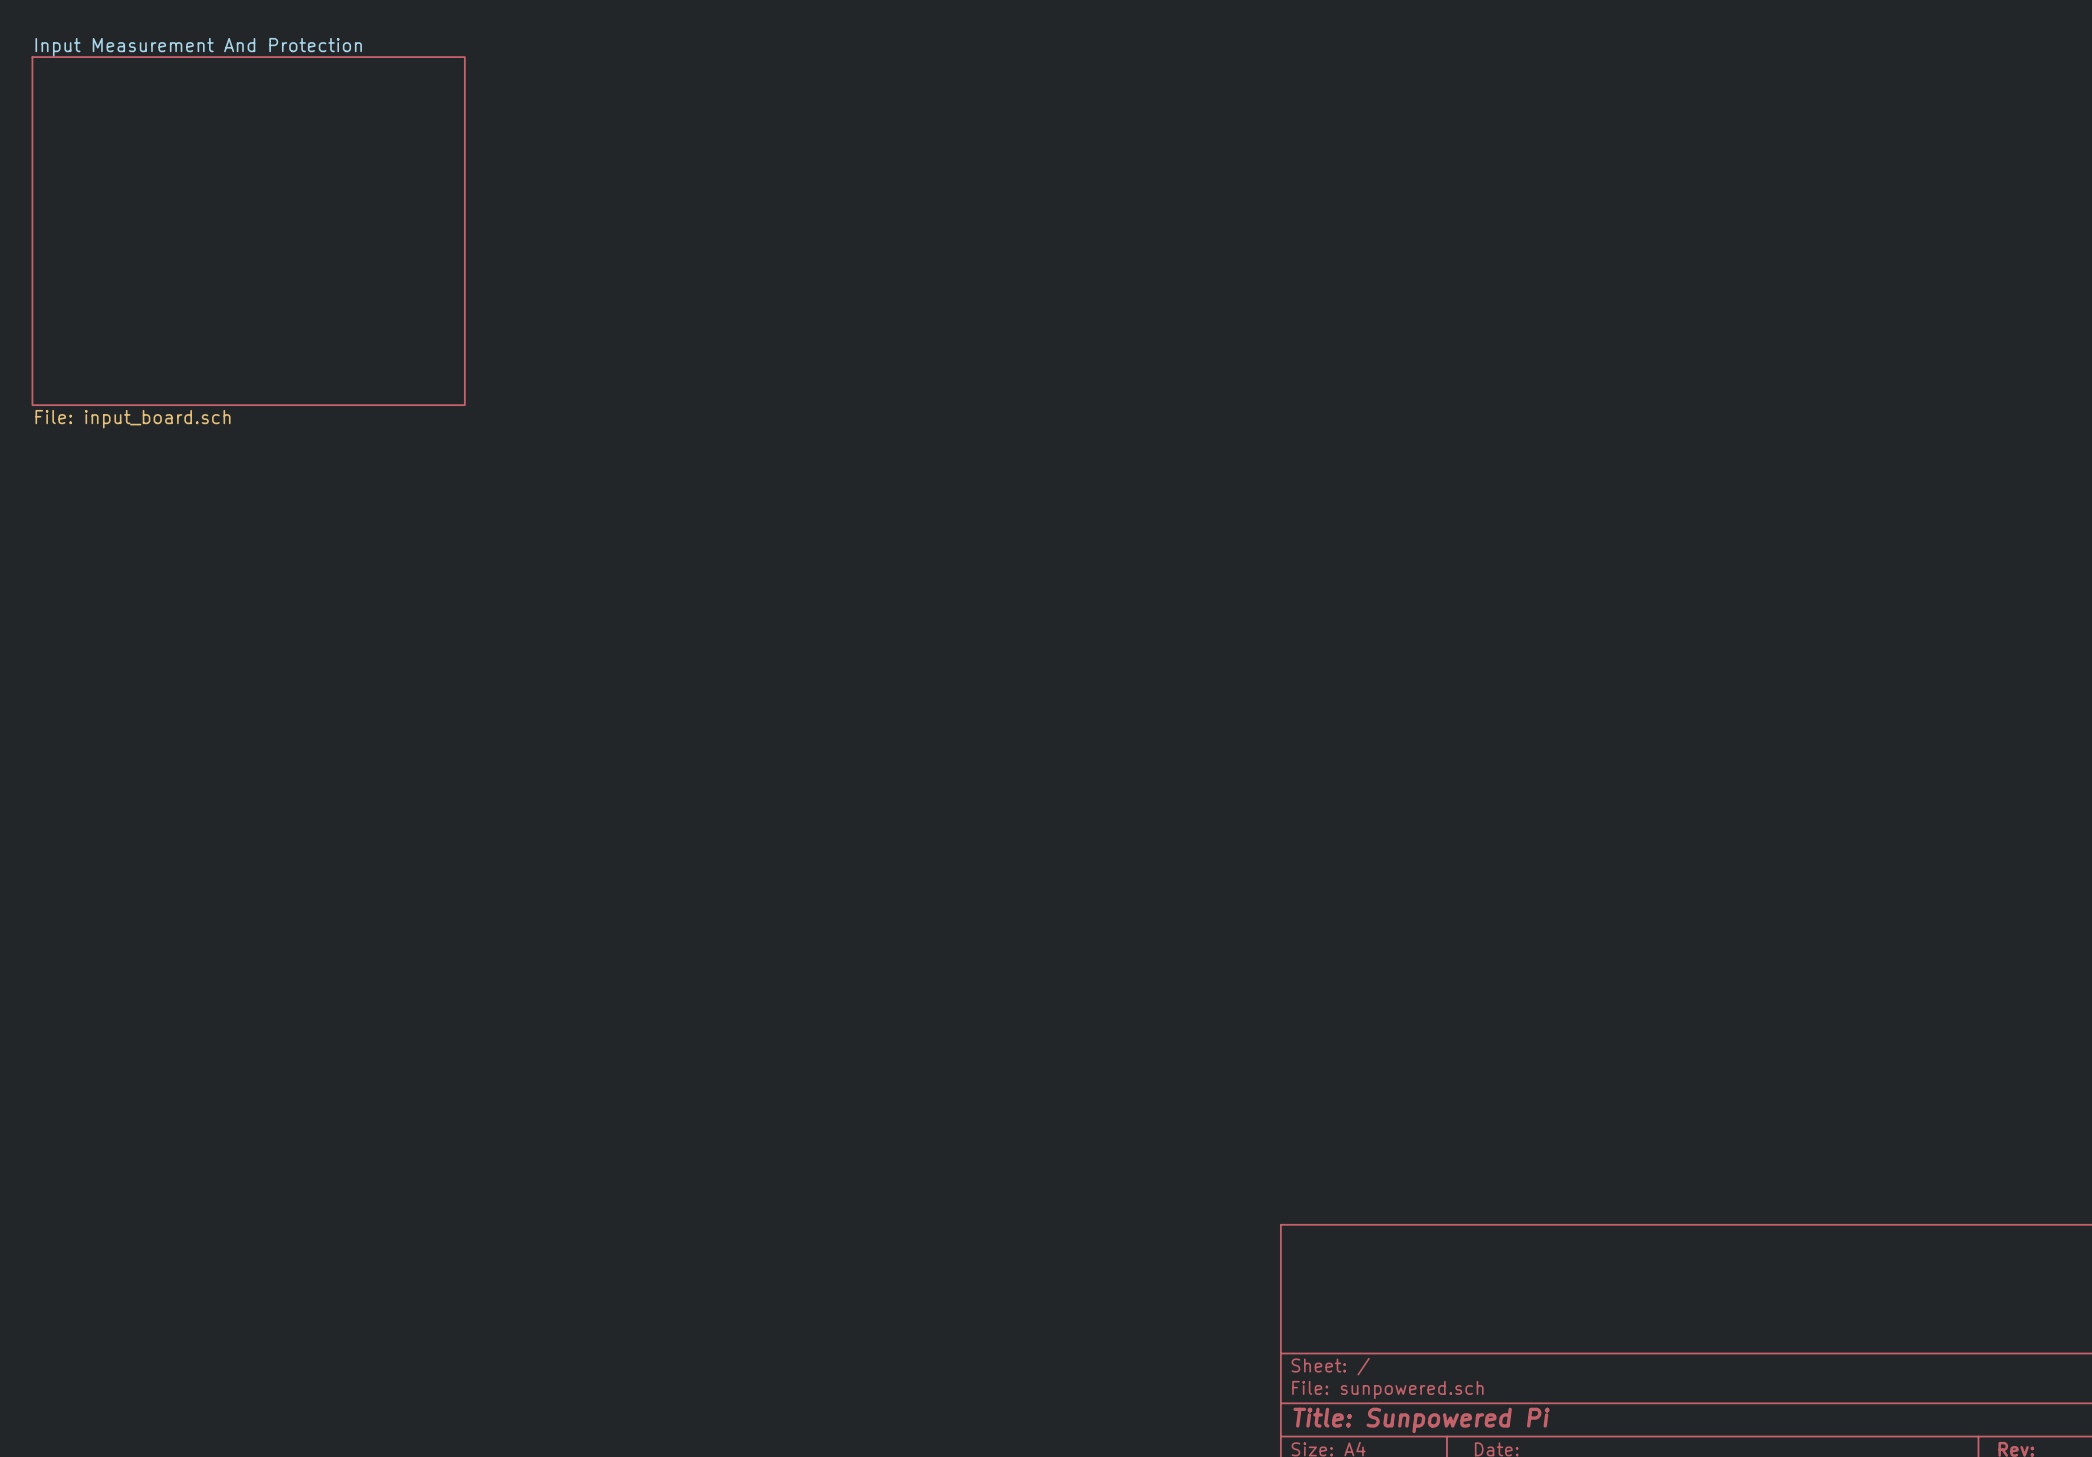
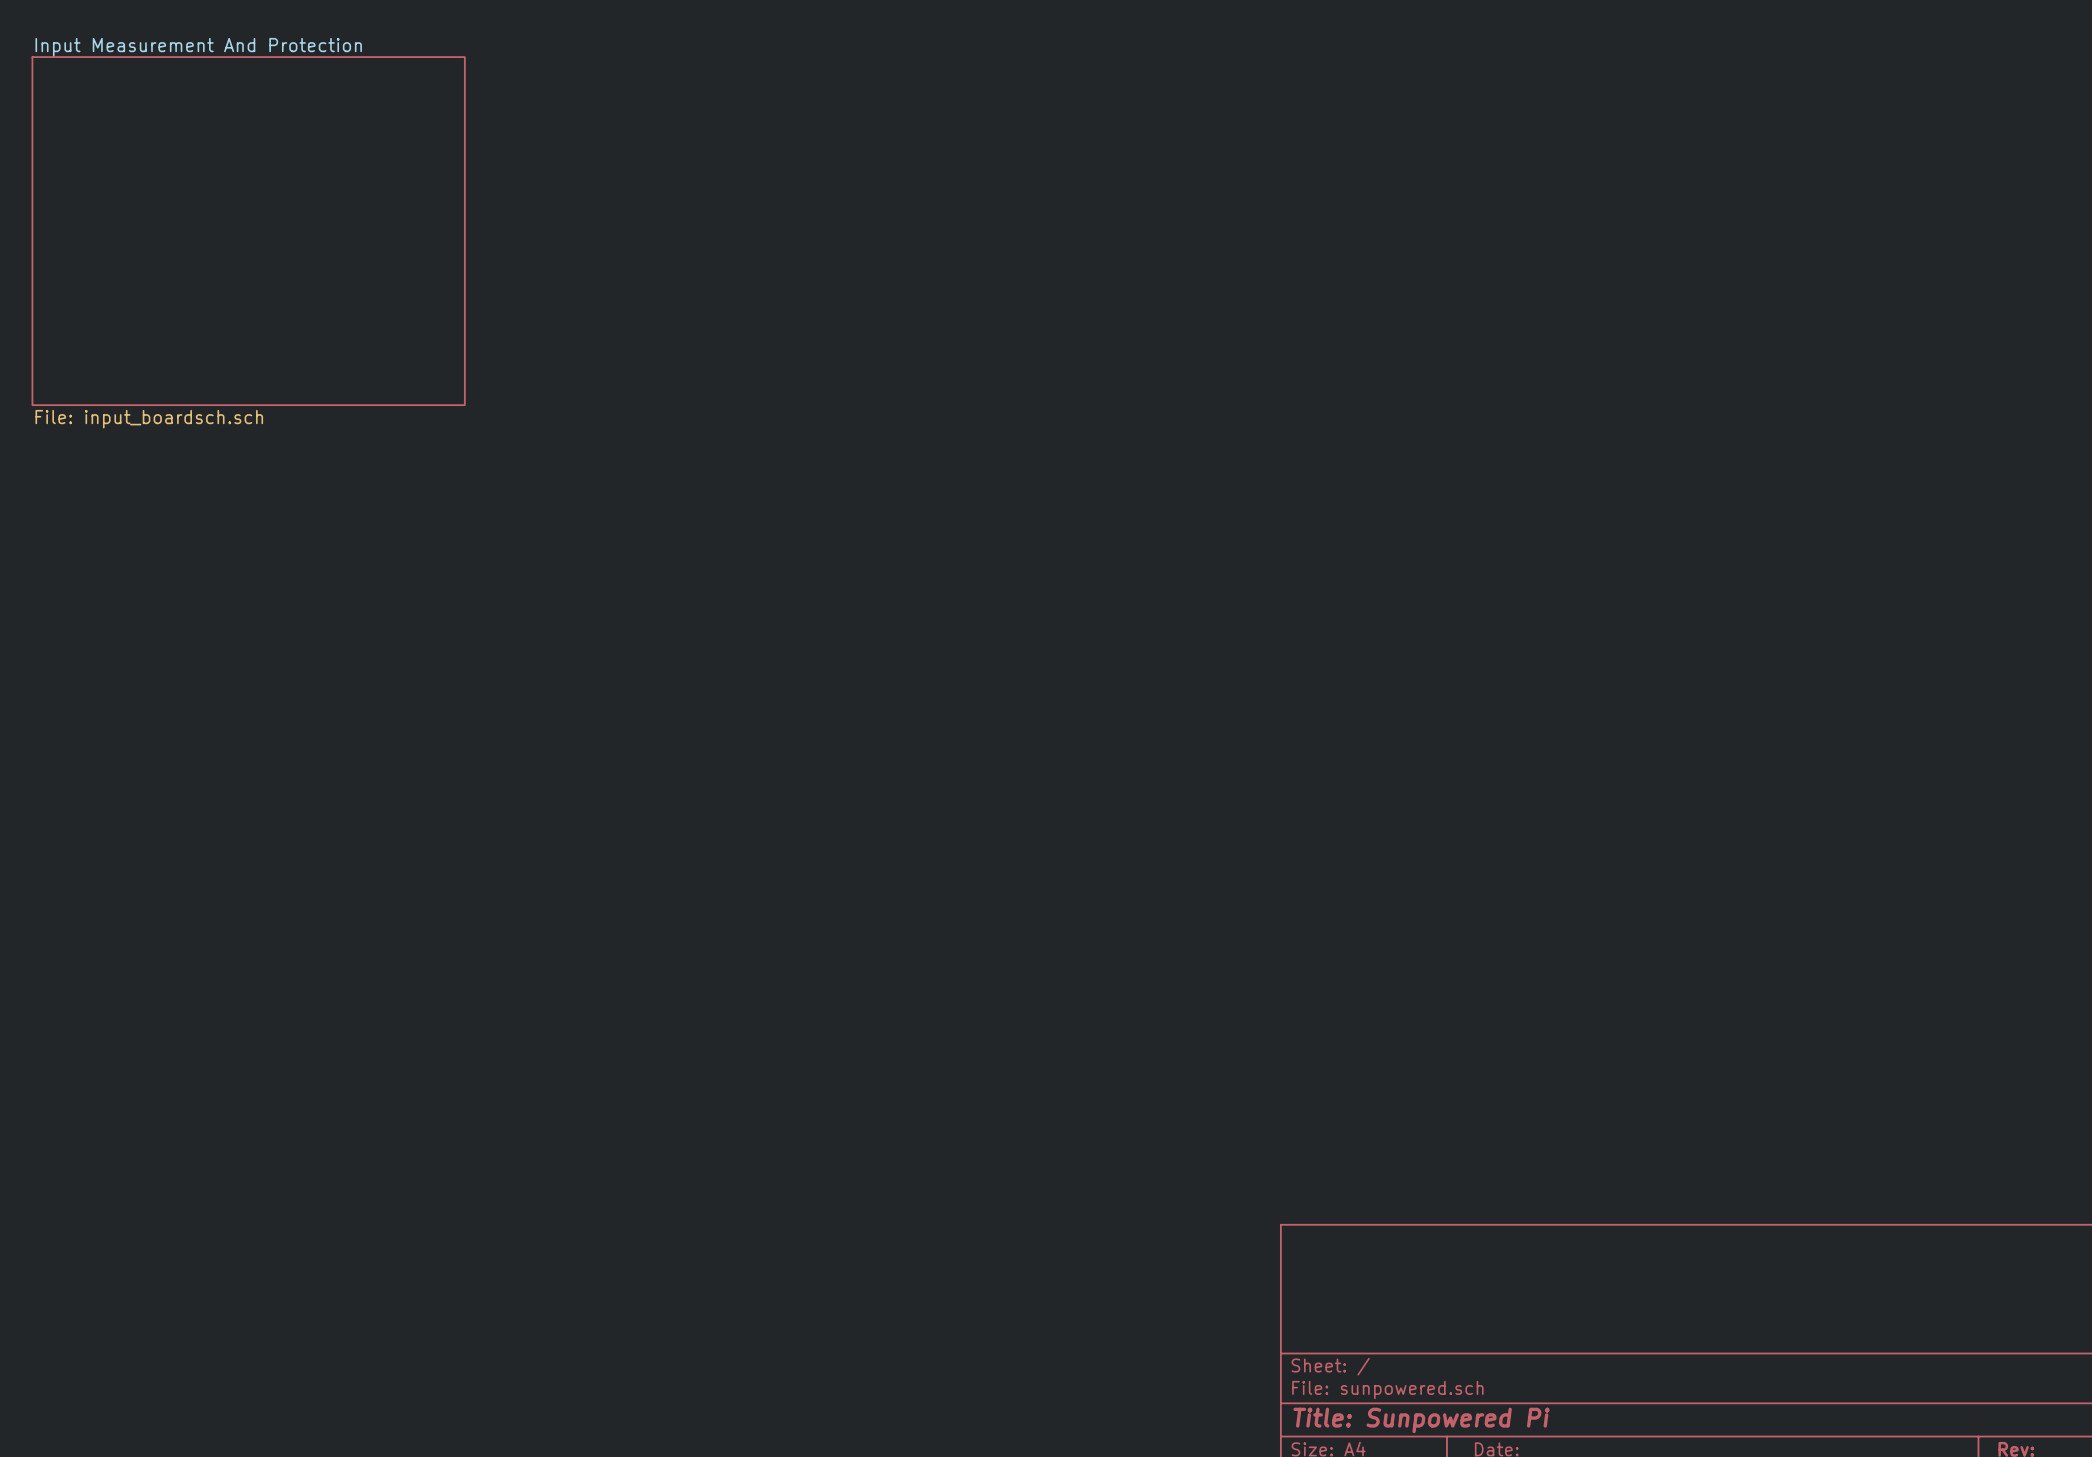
sheet Input Measurement And Protection value: File: input_board.sch (133, 419) -> File: input_boardsch.sch (149, 419)

